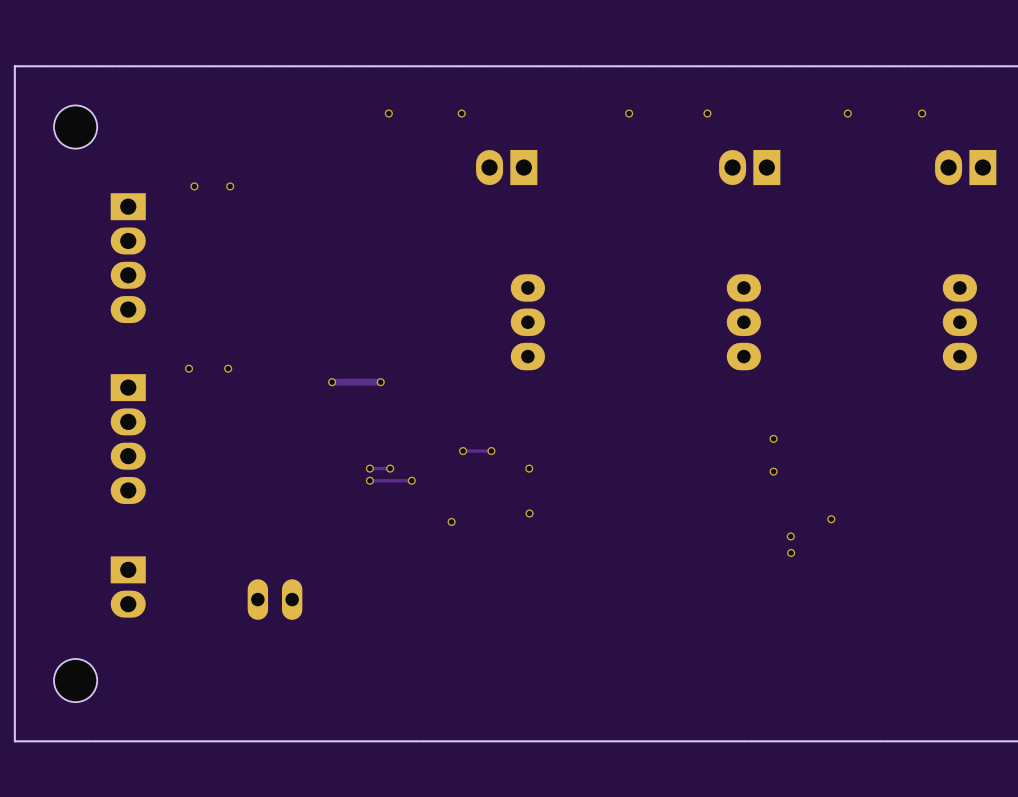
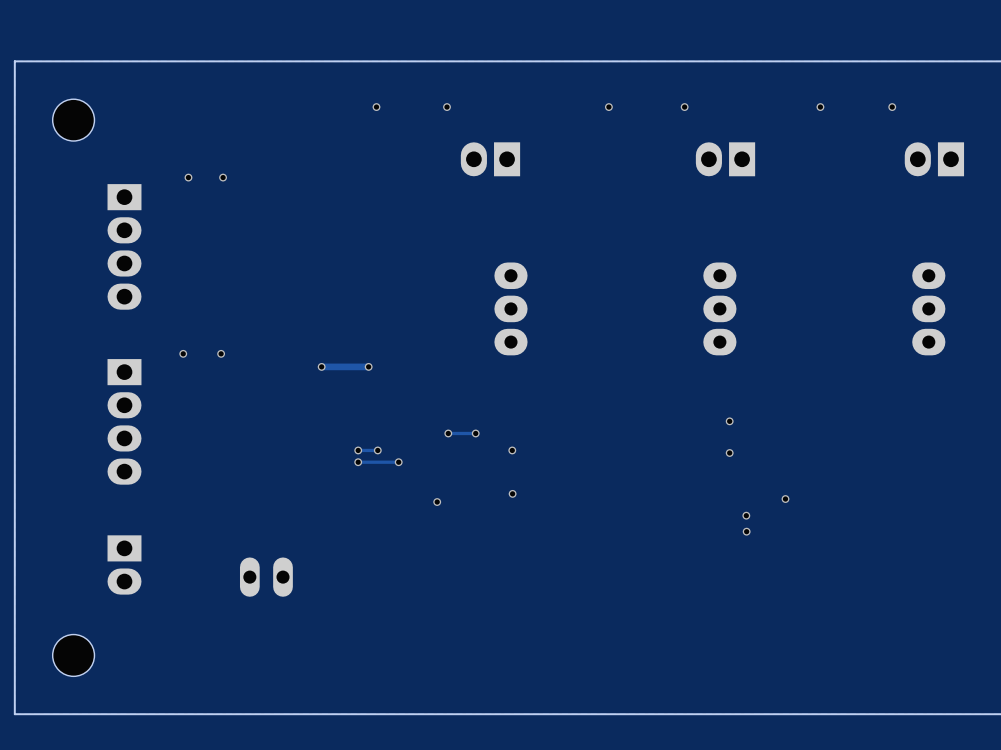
via: none -> (729, 421)
via: (773, 438) -> none
via: none -> (729, 453)
via: (773, 471) -> none
via: none -> (785, 499)
via: (831, 519) -> none
via: none -> (746, 515)
via: (790, 536) -> none
via: none -> (746, 531)
via: (791, 552) -> none

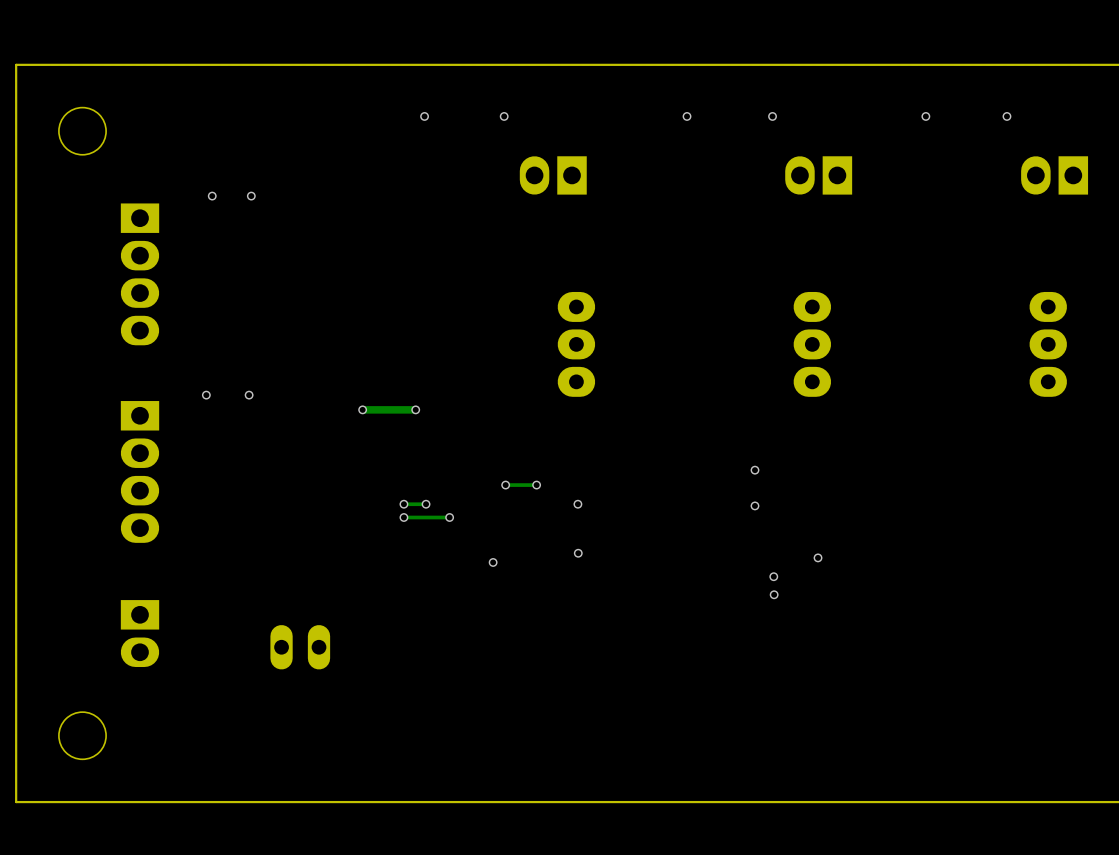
via: none -> (754, 470)
via: (729, 421) -> none
via: none -> (754, 505)
via: (729, 453) -> none
via: none -> (818, 557)
via: (785, 499) -> none
via: none -> (773, 576)
via: (746, 515) -> none
via: none -> (774, 594)
via: (746, 531) -> none

